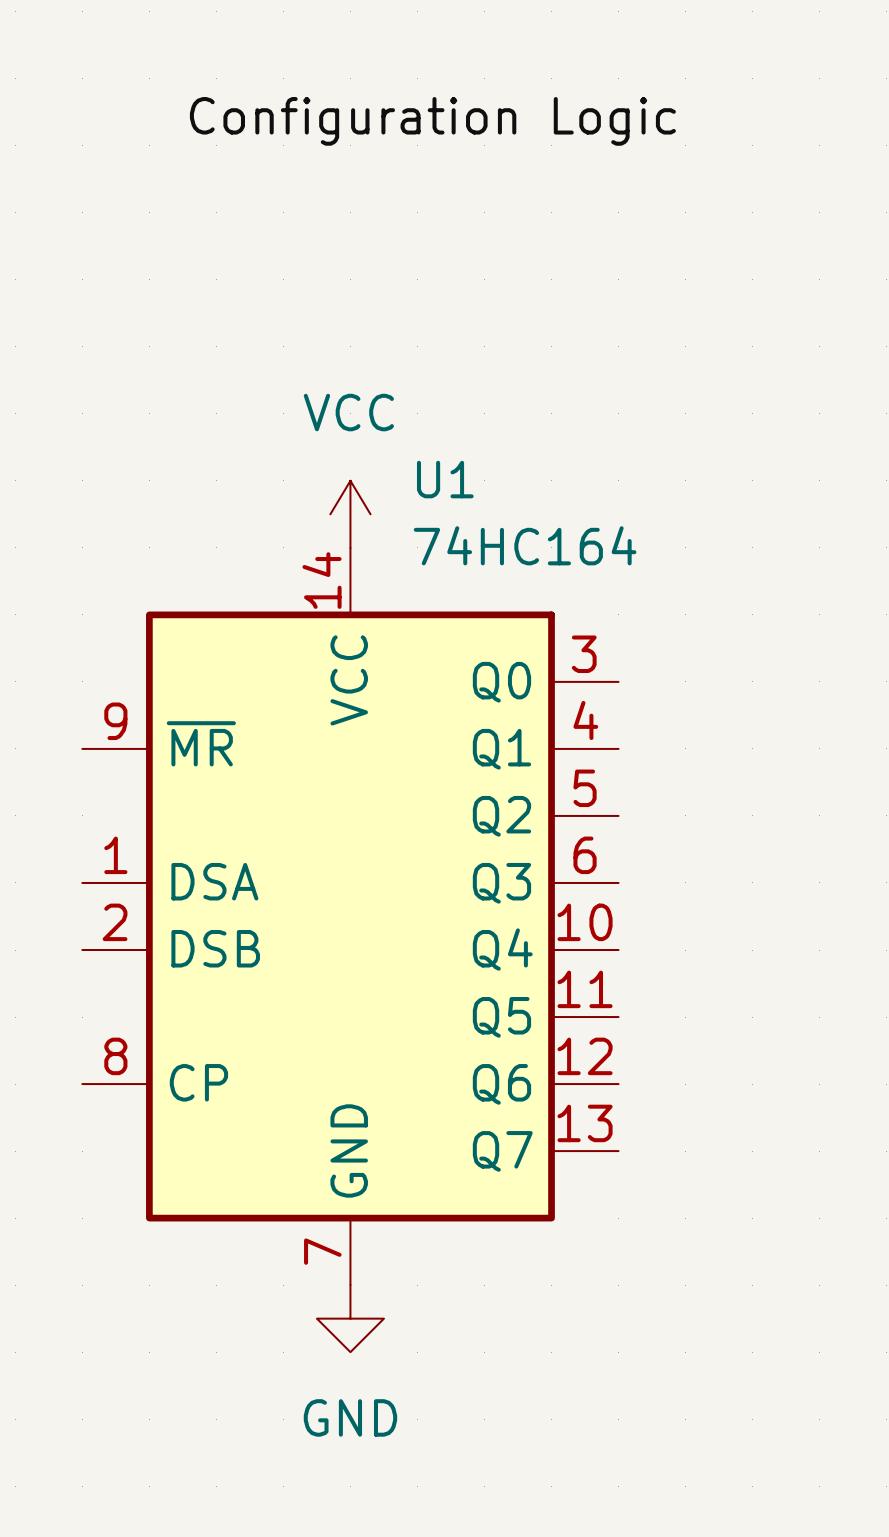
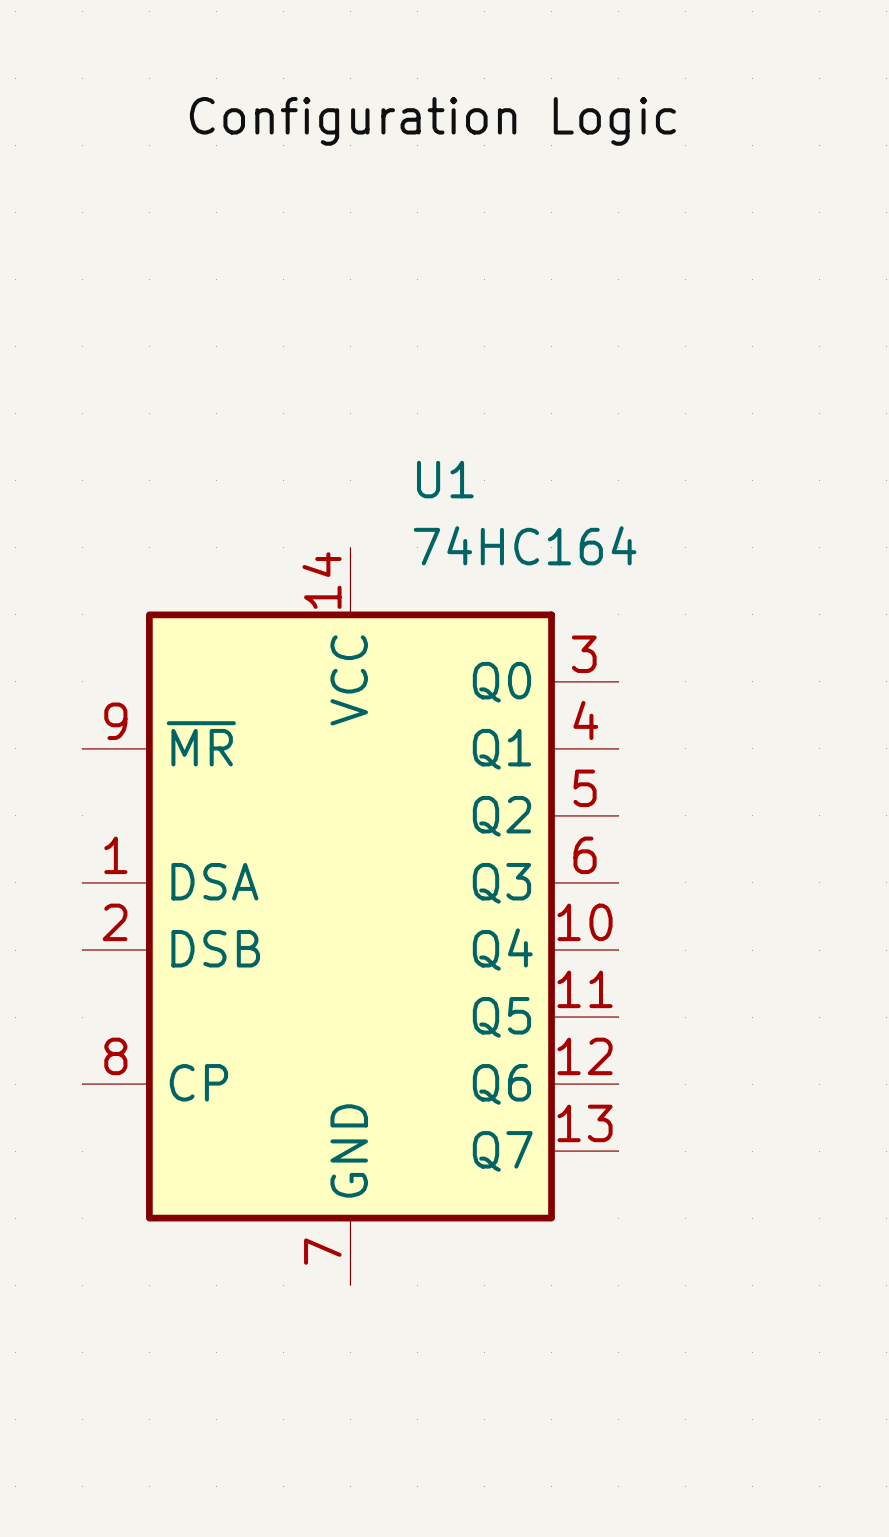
power symbol: VCC (350, 514) -> none
power symbol: GND (350, 1318) -> none

